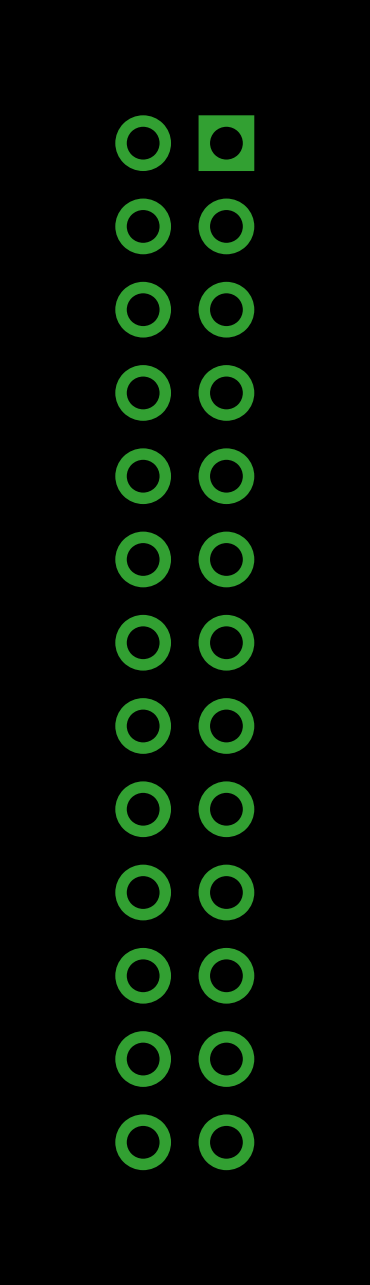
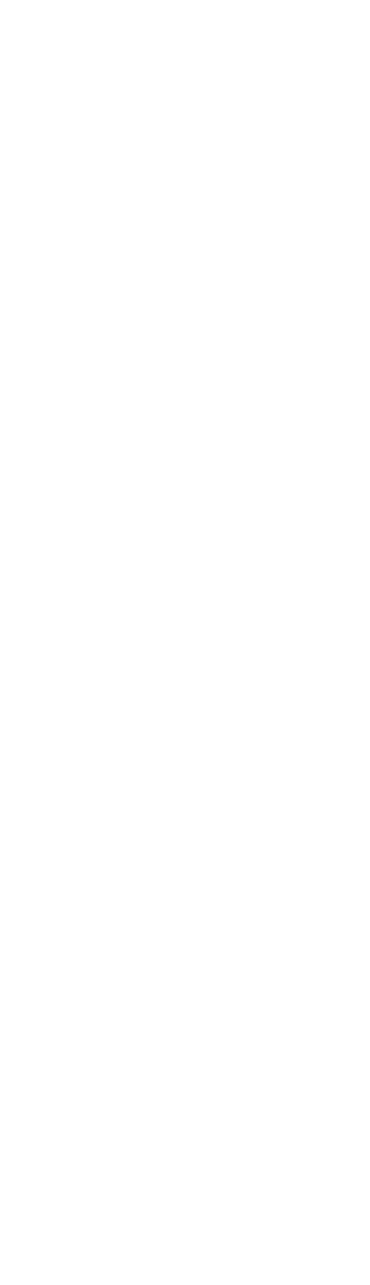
part: (184, 642) -> none

